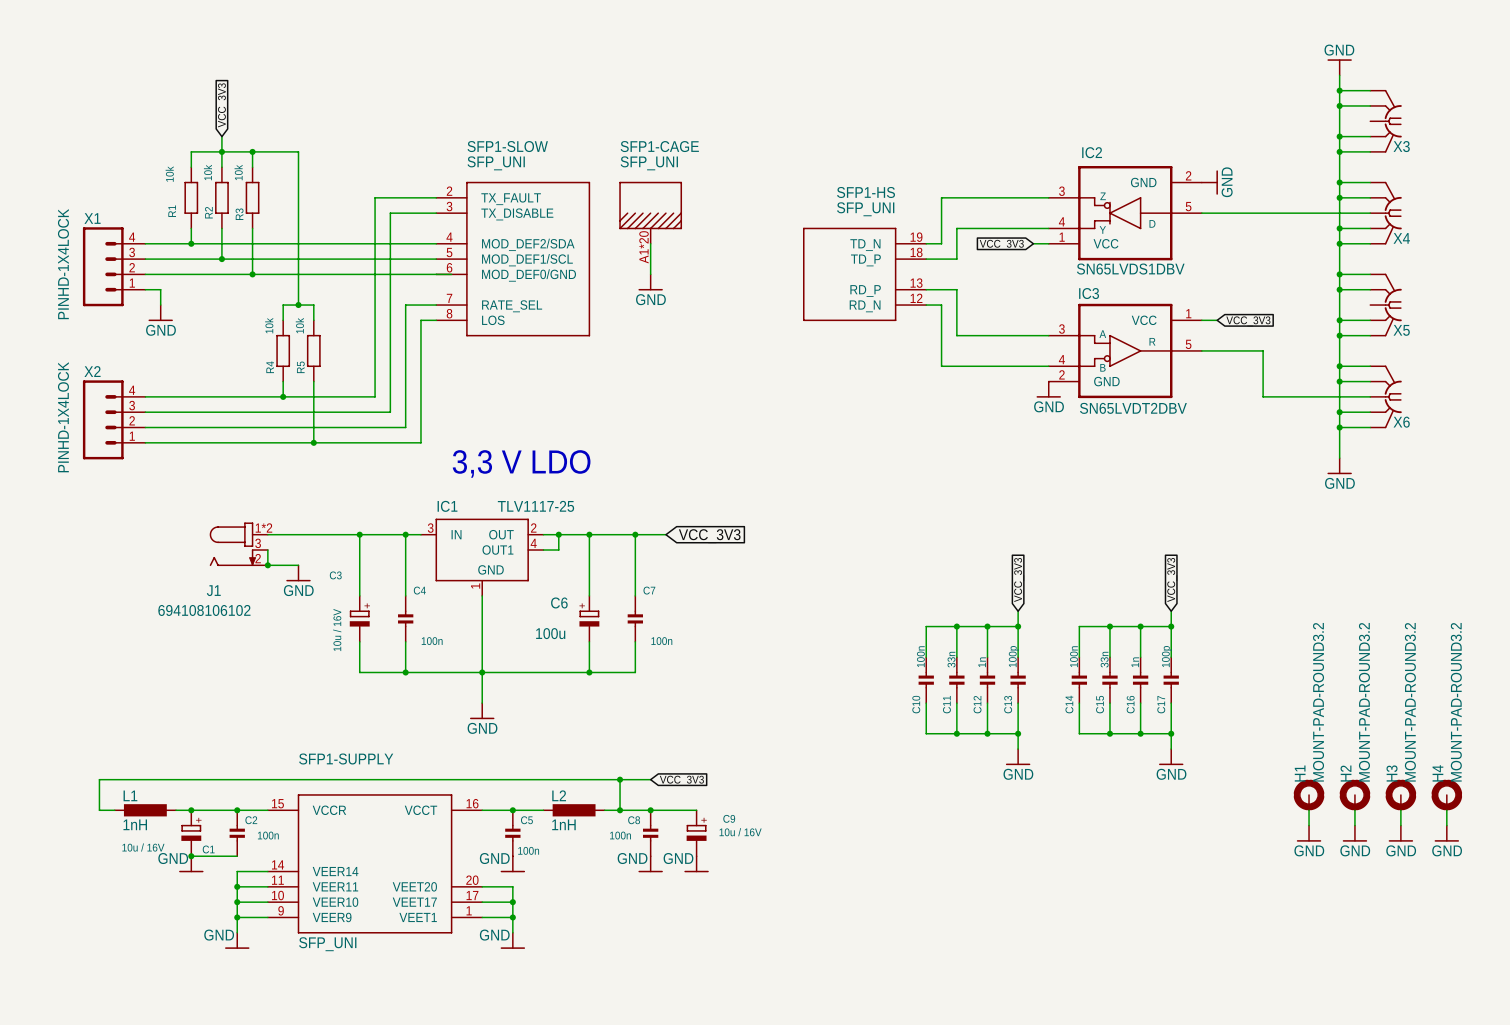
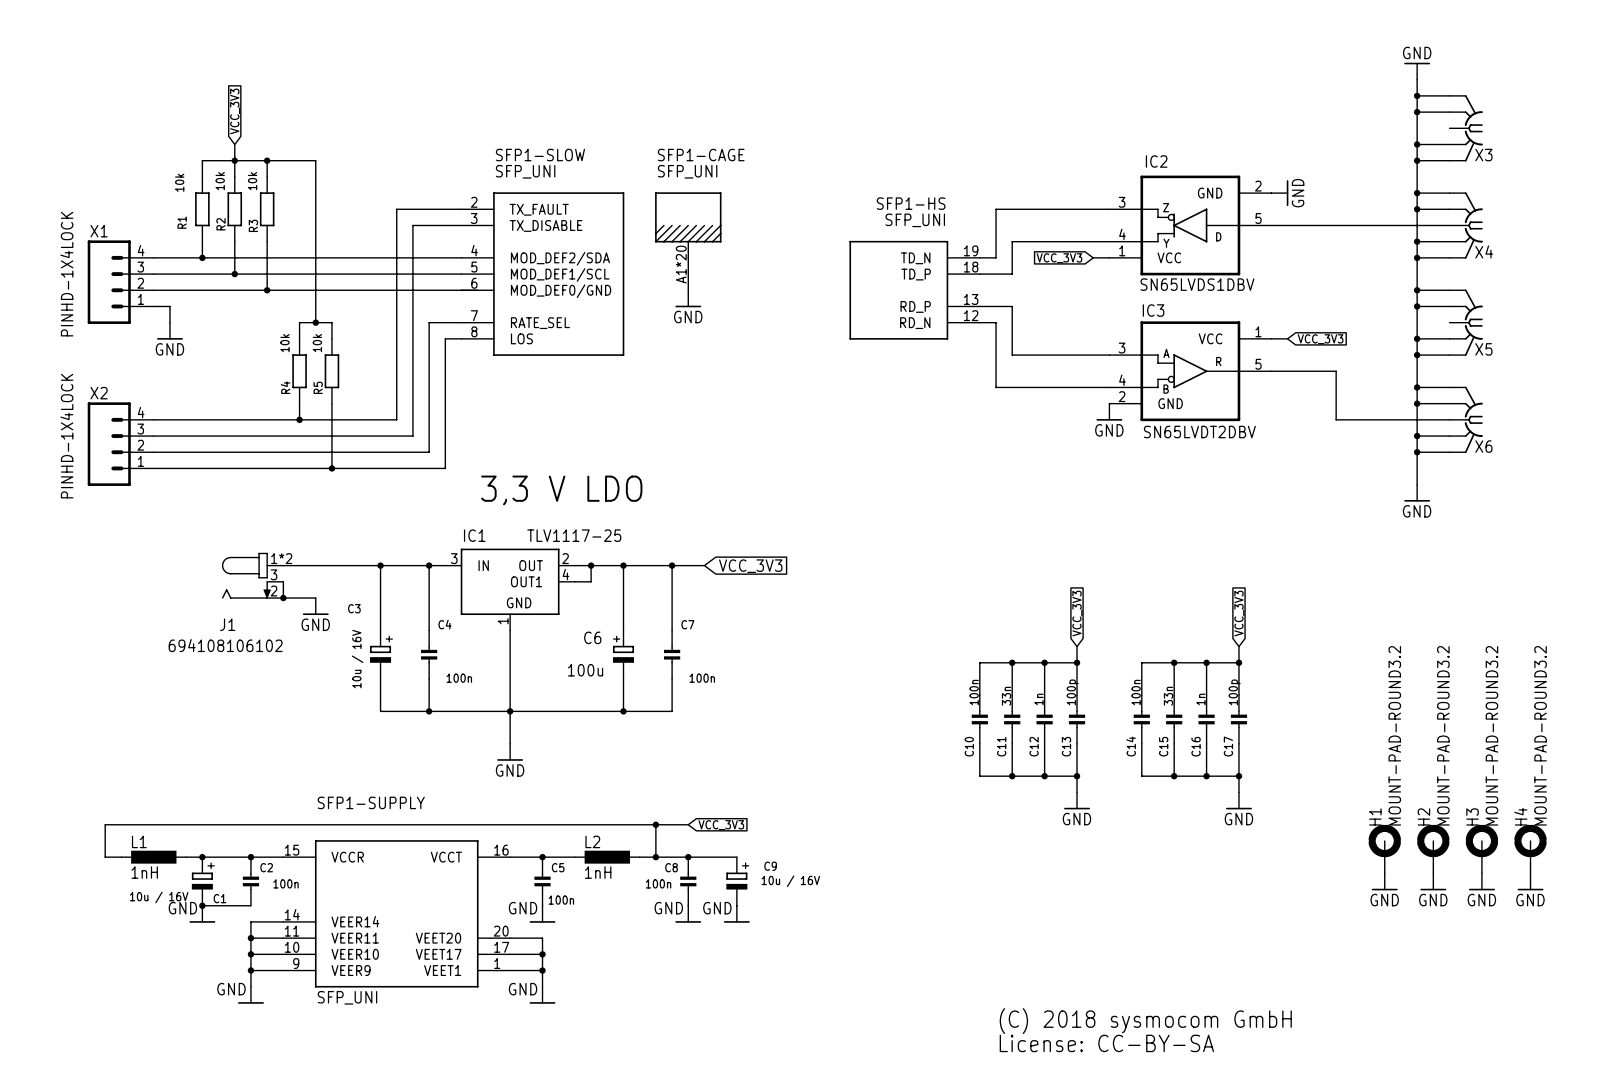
text: none -> (C) 2018 sysmocom GmbH (1145, 1021)
text: none -> License: CC-BY-SA (1106, 1043)

